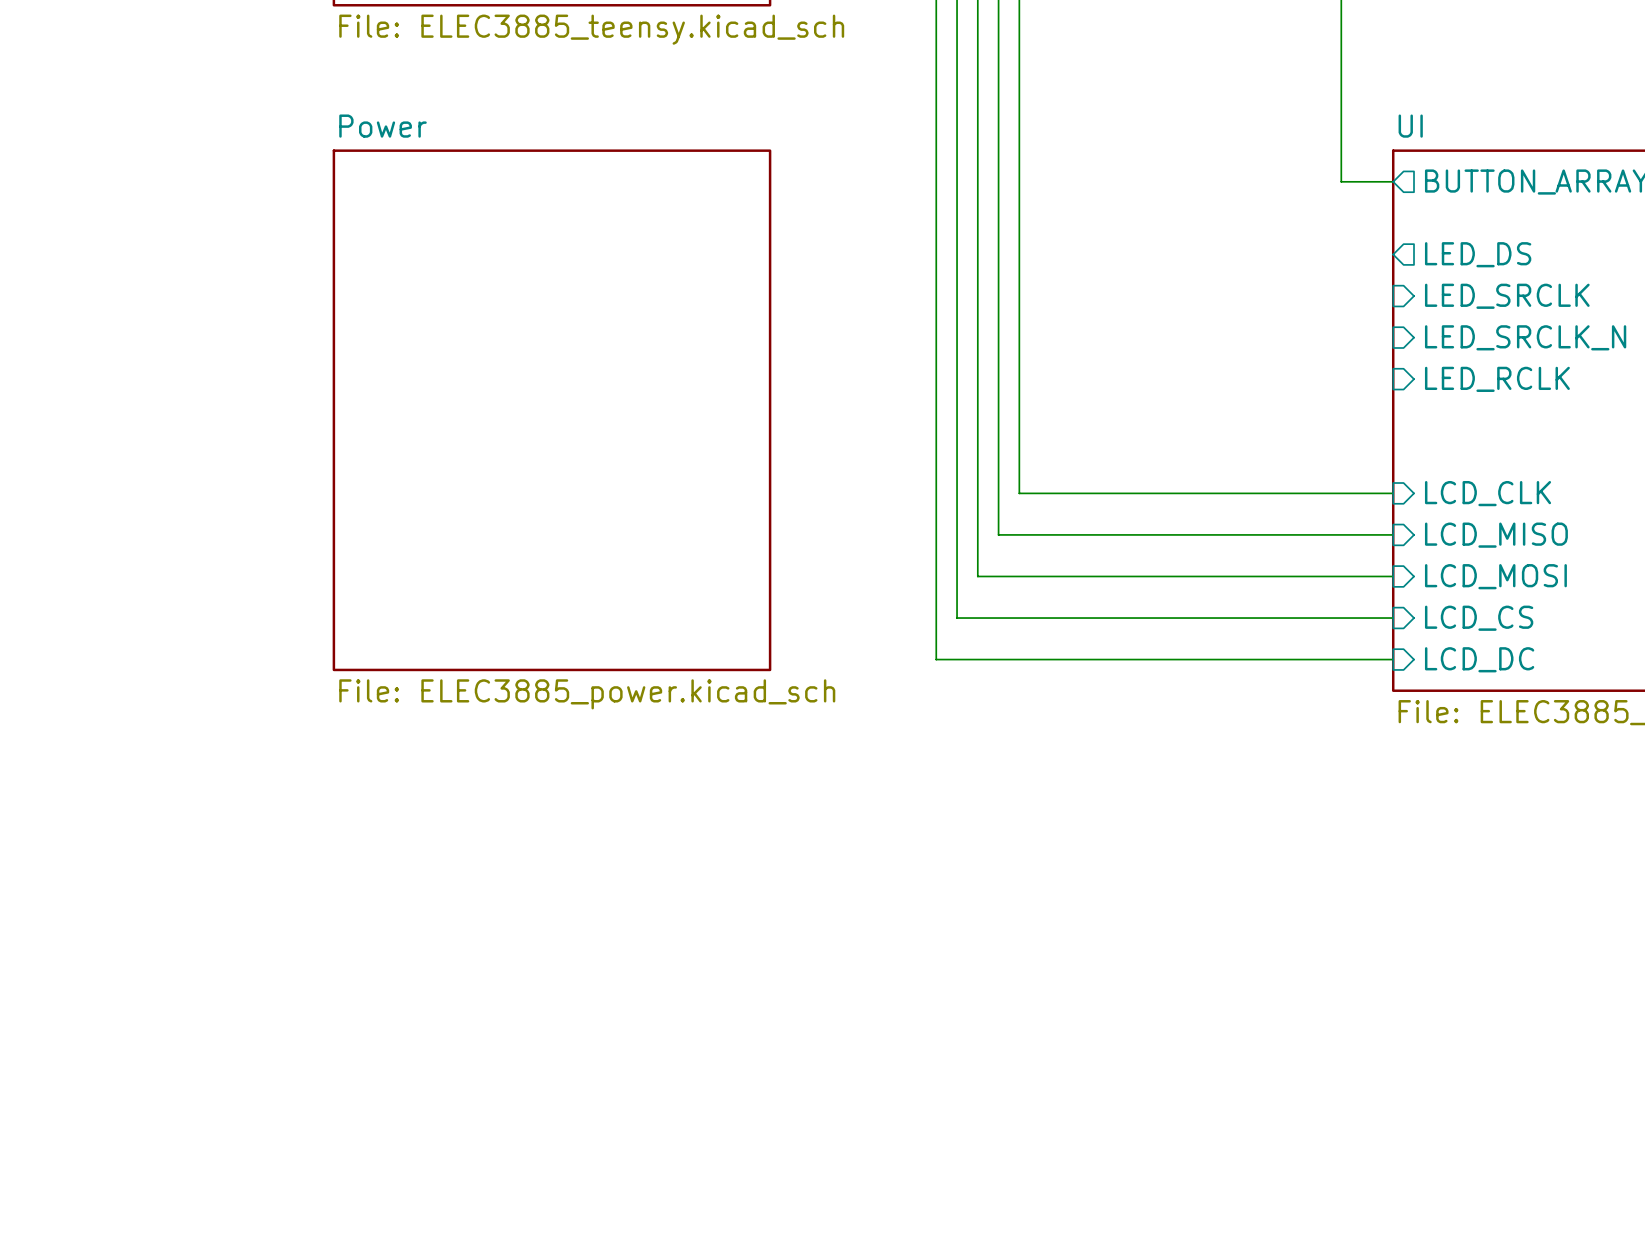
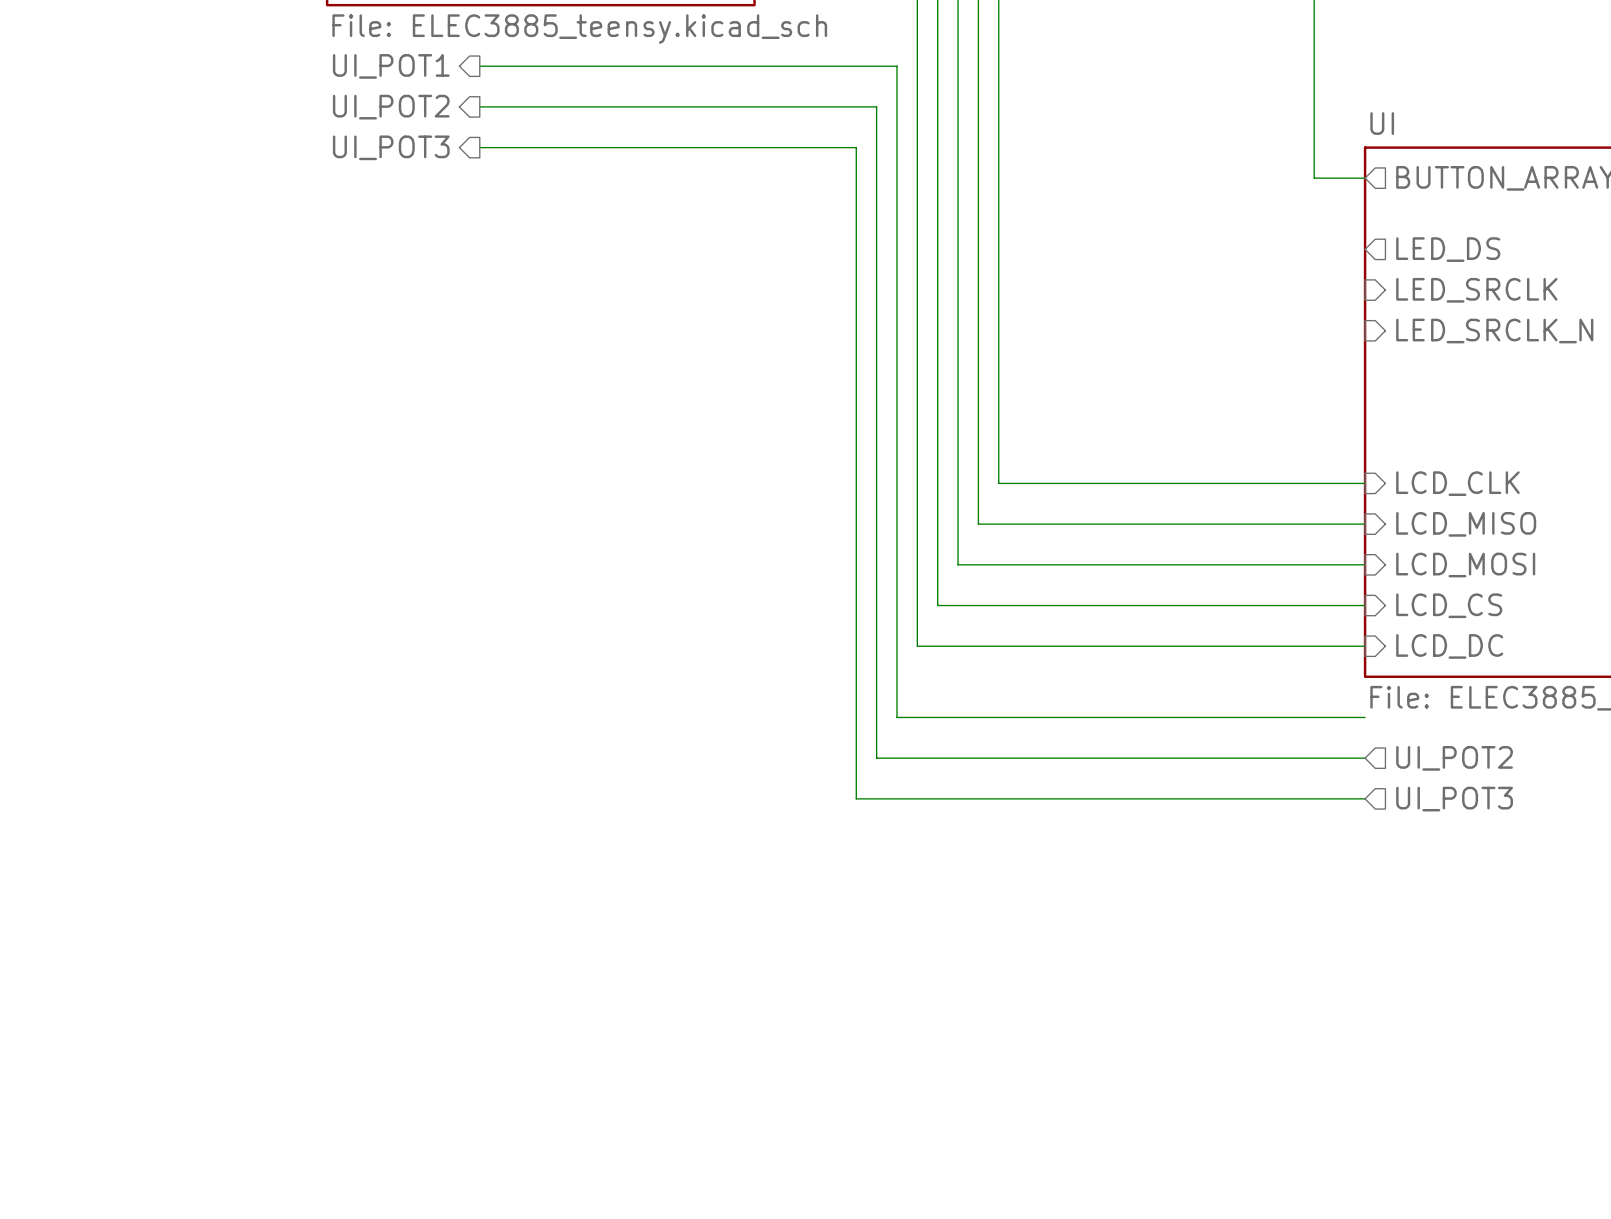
sheet pin: none -> UI_POT1 (391, 66)
wire: none -> (479, 66) (896, 66) (896, 717) (1365, 717)
sheet pin: none -> UI_POT2 (391, 107)
wire: none -> (479, 106) (876, 106) (876, 758) (1365, 758)
sheet pin: none -> UI_POT3 (391, 147)
wire: none -> (479, 147) (856, 147) (856, 798) (1365, 798)
sheet pin: LED_RCLK (1497, 379) -> none
sheet Power: File: ELEC3885_power.kicad_sch (551, 410) -> none
sheet pin: none -> UI_POT2 (1454, 758)
sheet pin: none -> UI_POT3 (1454, 799)

